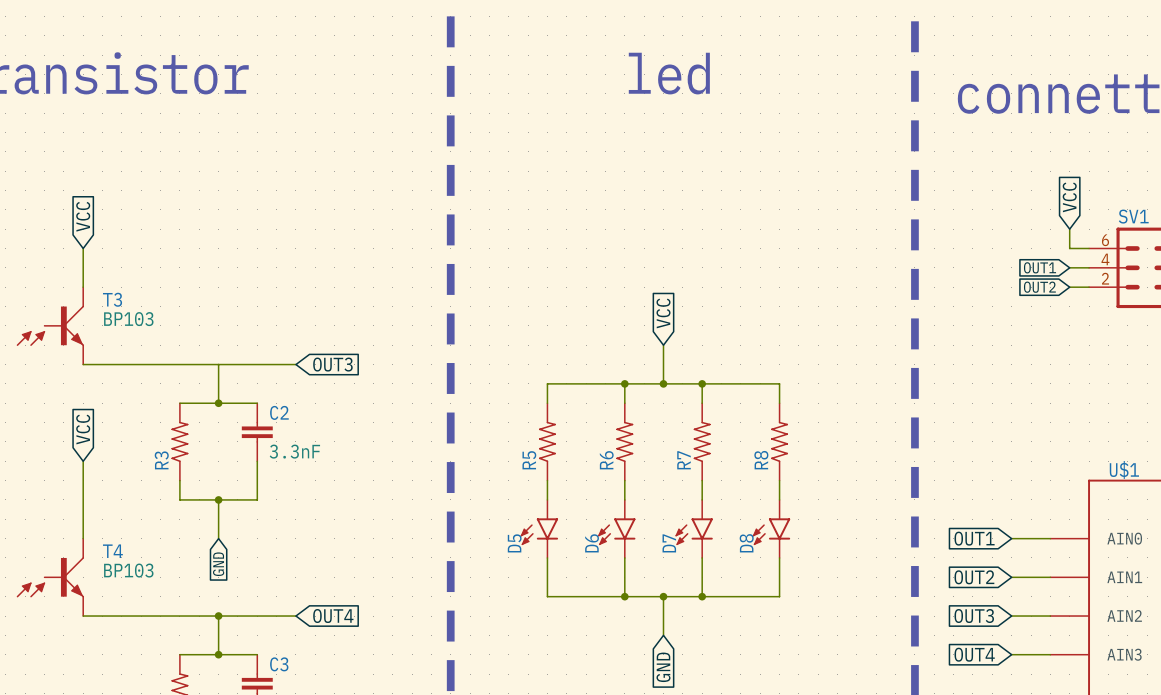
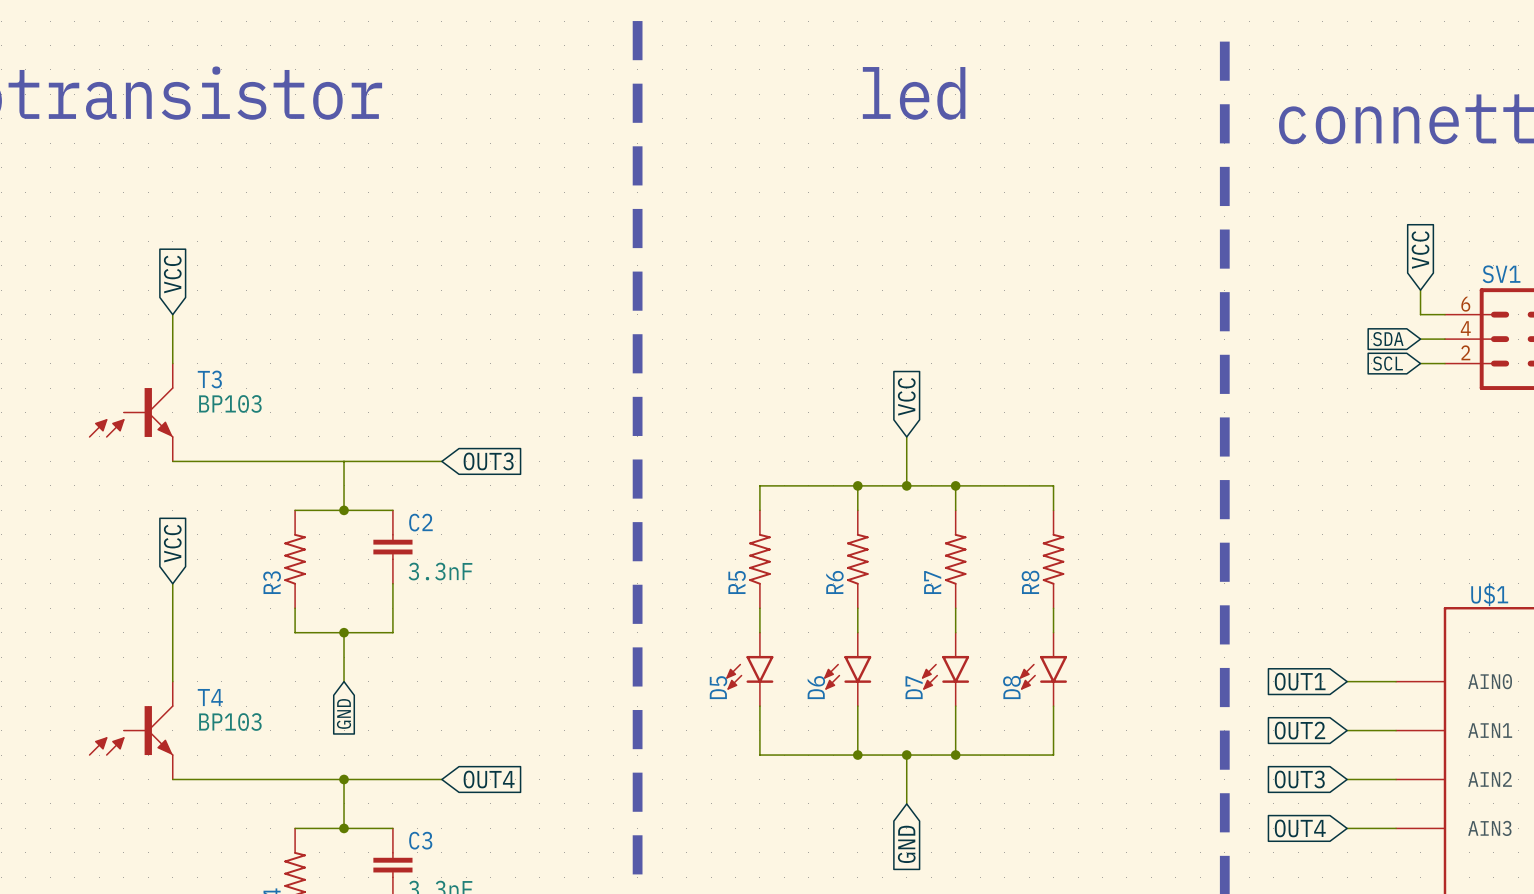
global label: OUT1 (1040, 267) -> SDA (1388, 339)
global label: OUT2 (1039, 287) -> SCL (1388, 363)

